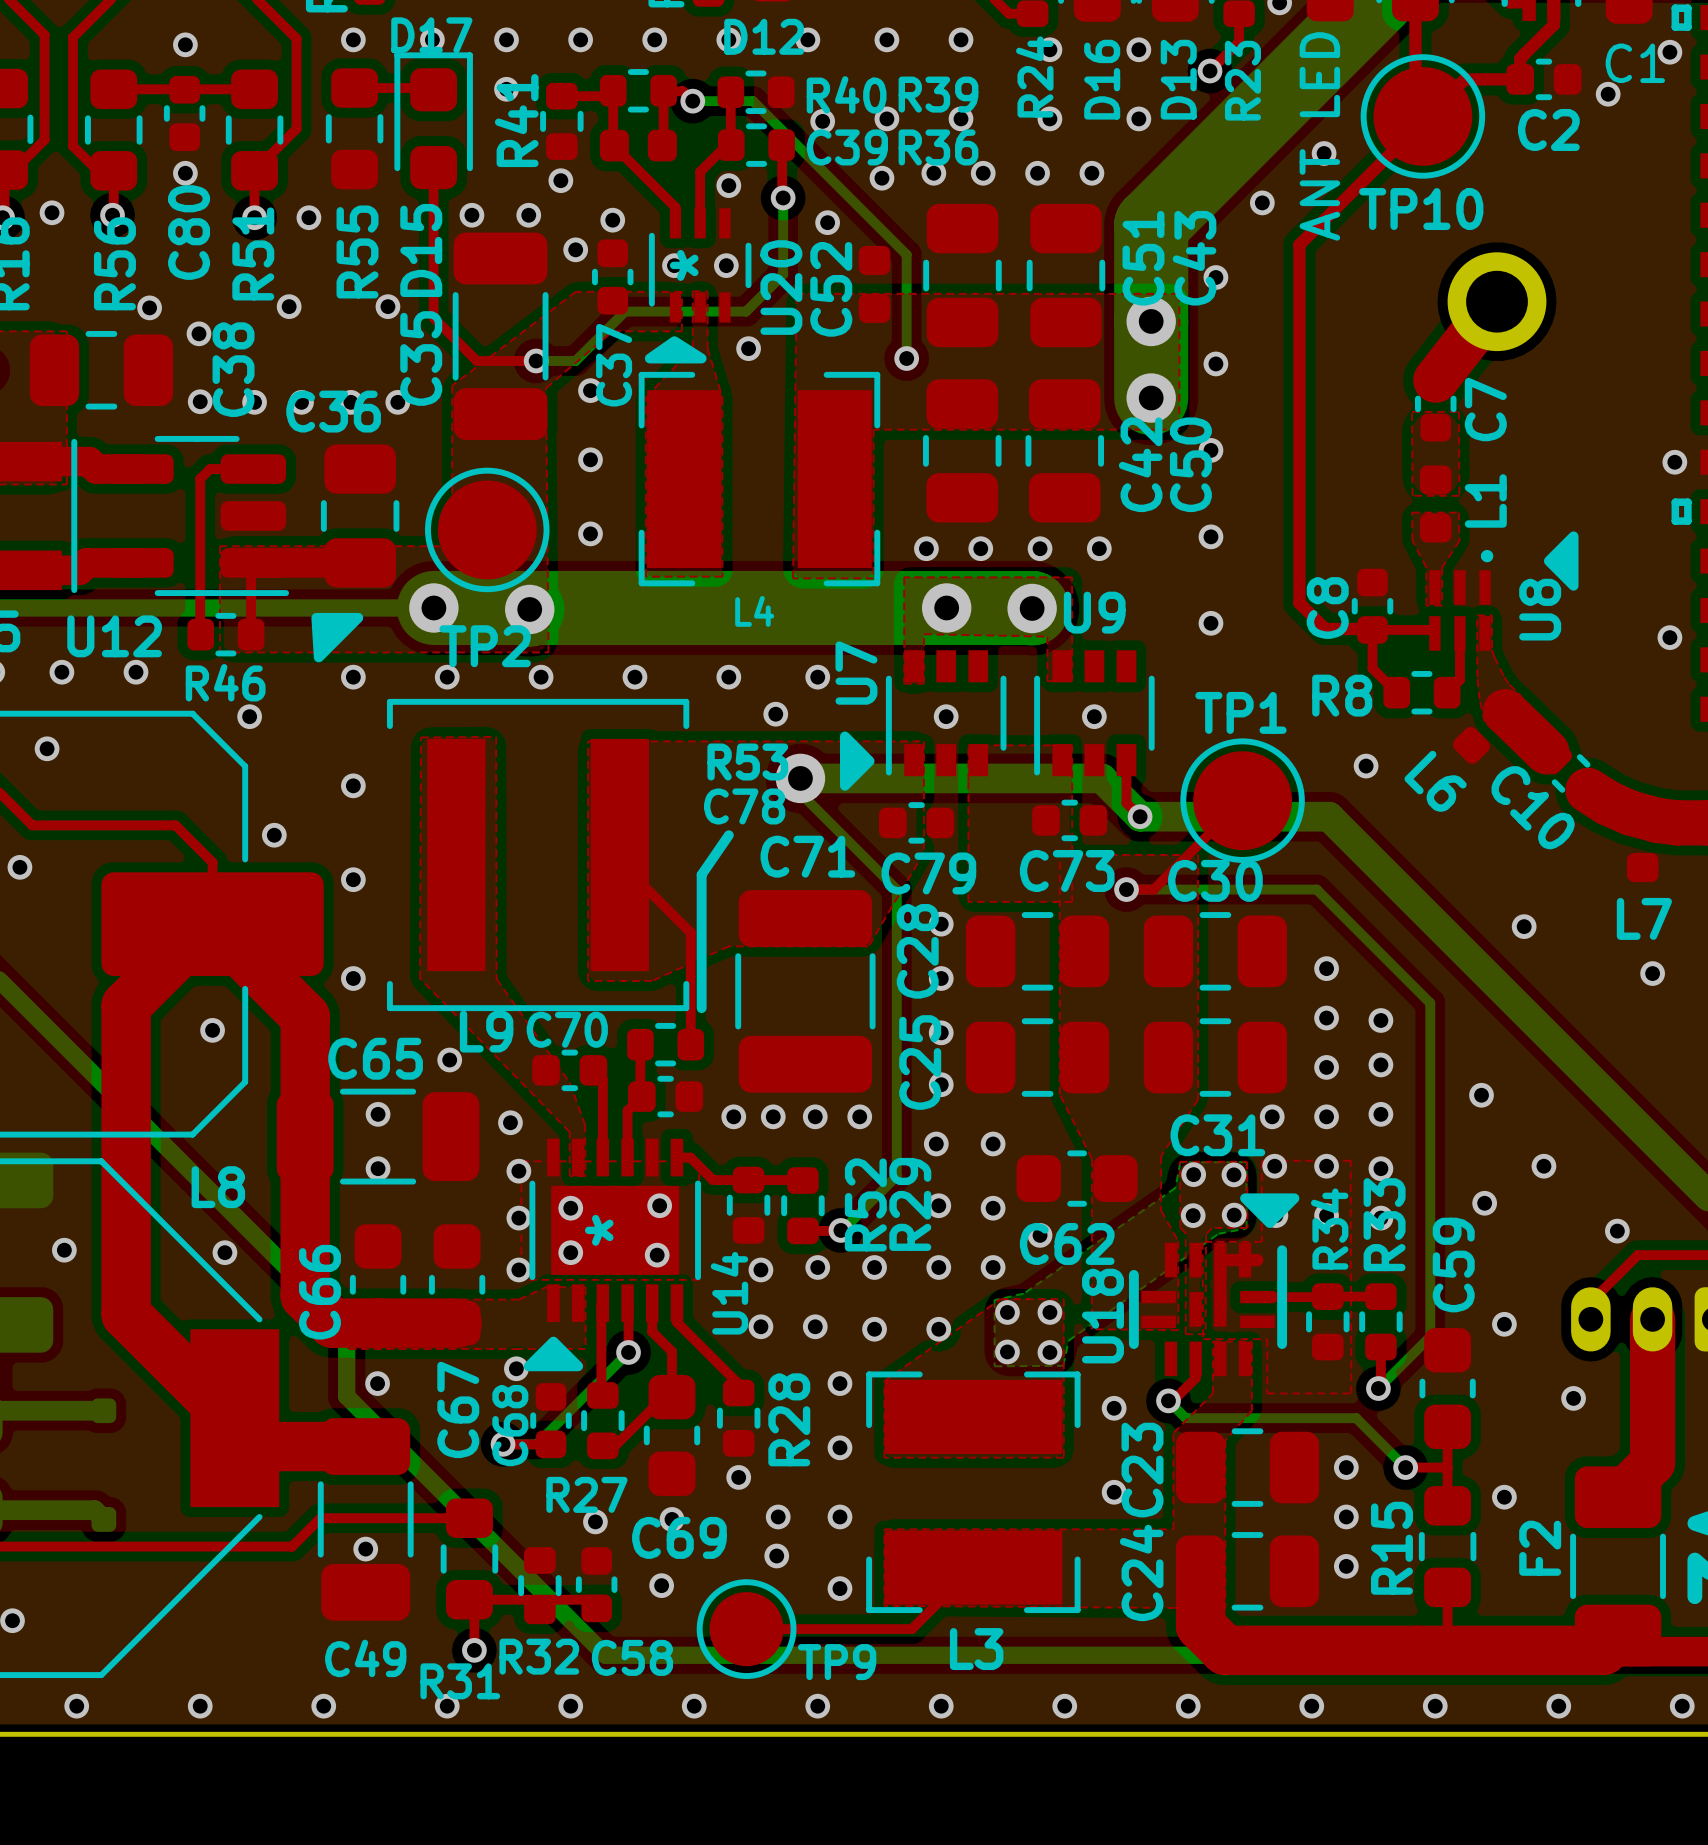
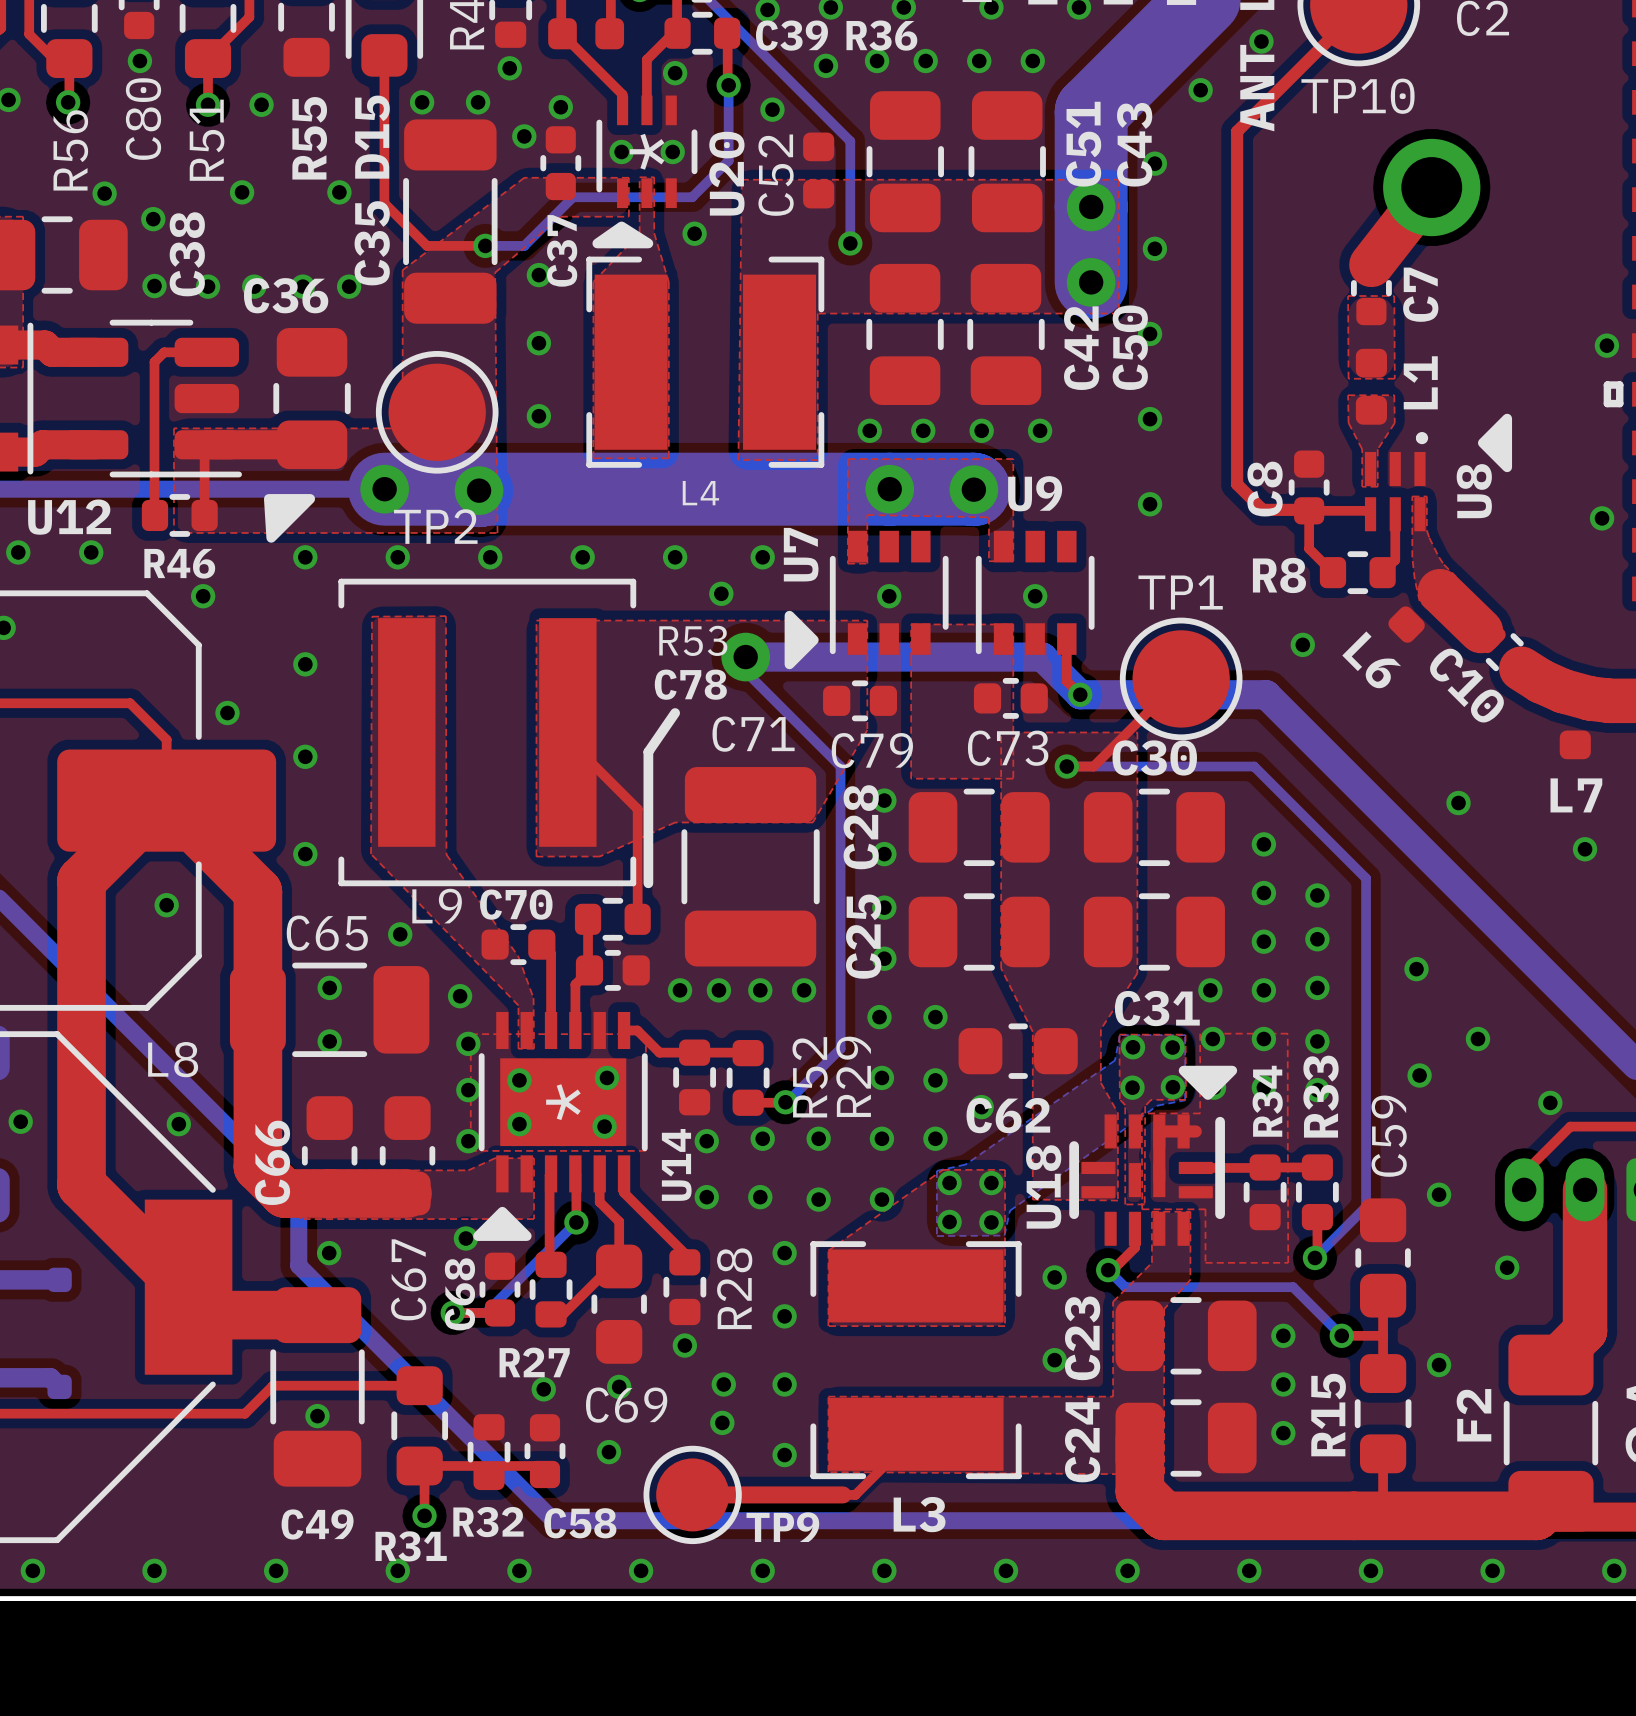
top track width: thin (746, 1629) (899, 1629) -> thick (692, 1494) (843, 1494)

